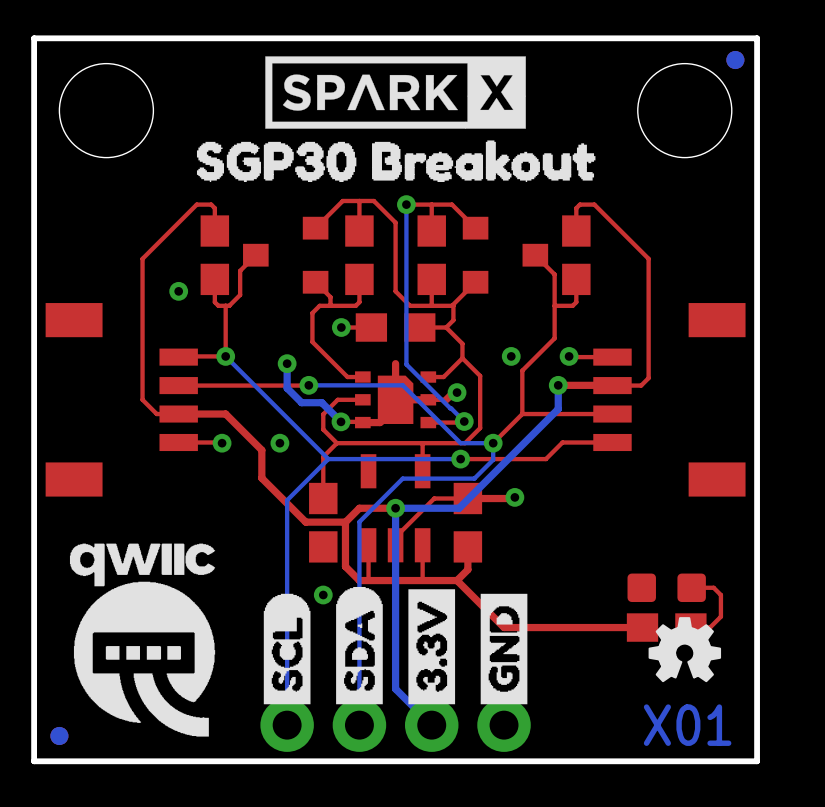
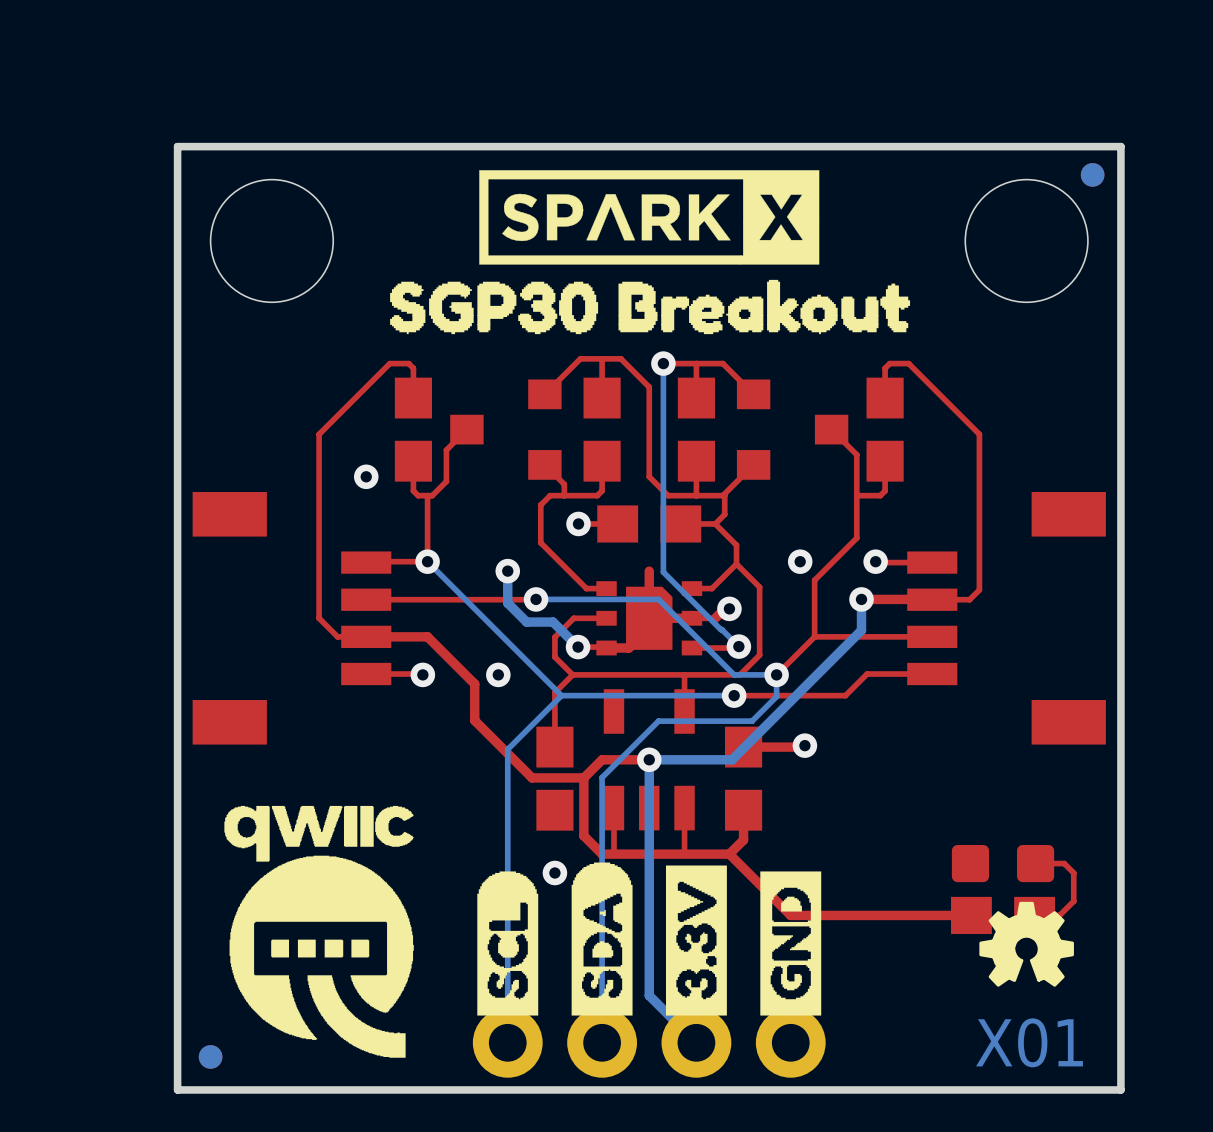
top track: (467, 498) (434, 498) (395, 537) (395, 545) -> none

